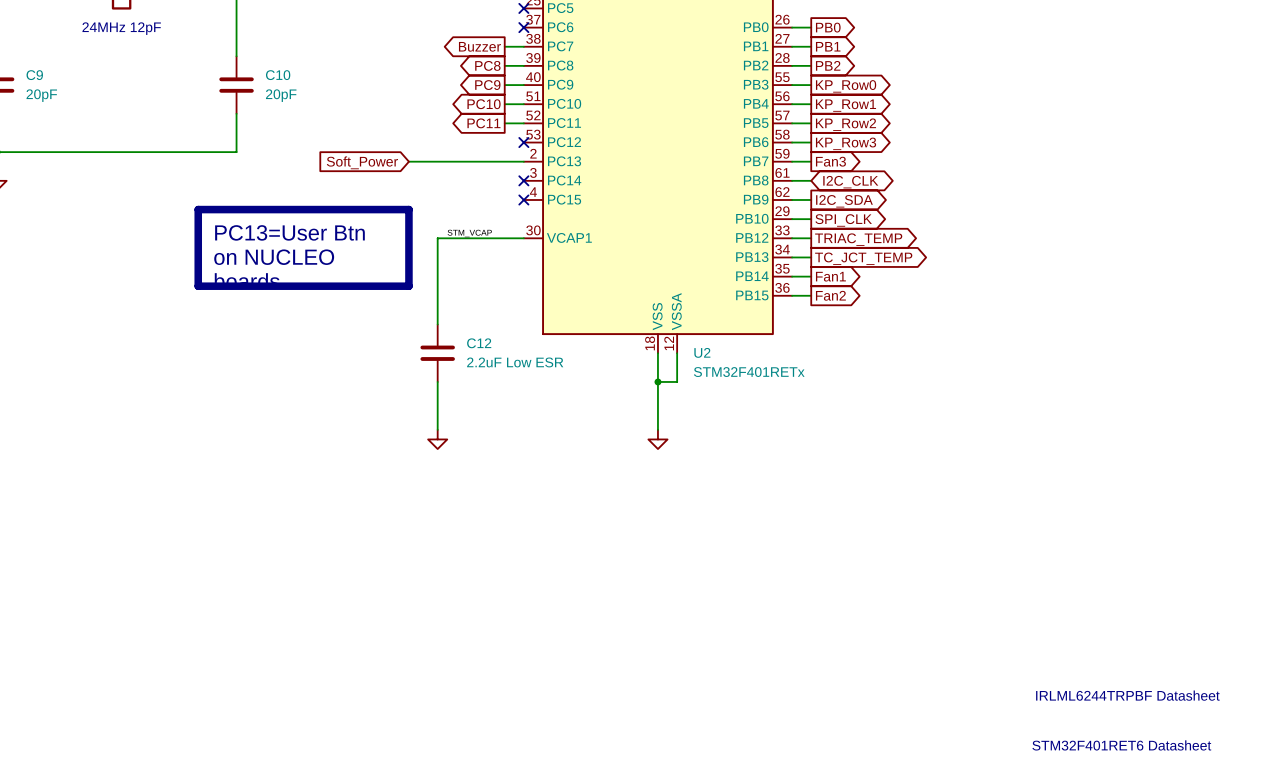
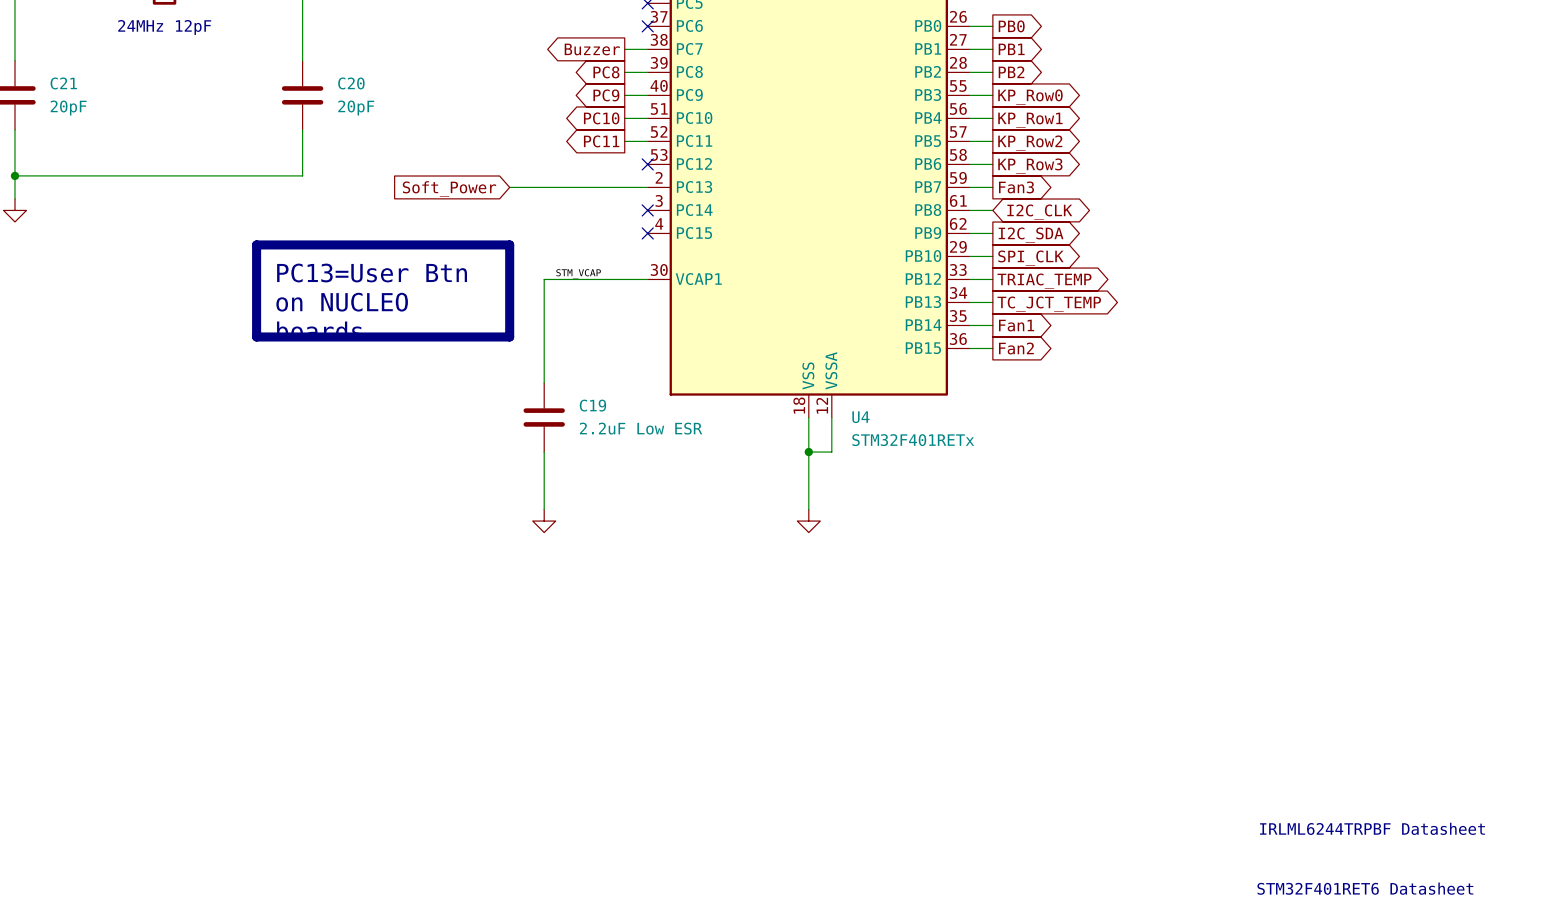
C9 name: C9 (34, 75) -> C21 (63, 83)
C10 name: C10 (278, 75) -> C20 (351, 83)
C12 name: C12 (479, 343) -> C19 (592, 405)
U2 name: U2 (702, 352) -> U4 (860, 417)

